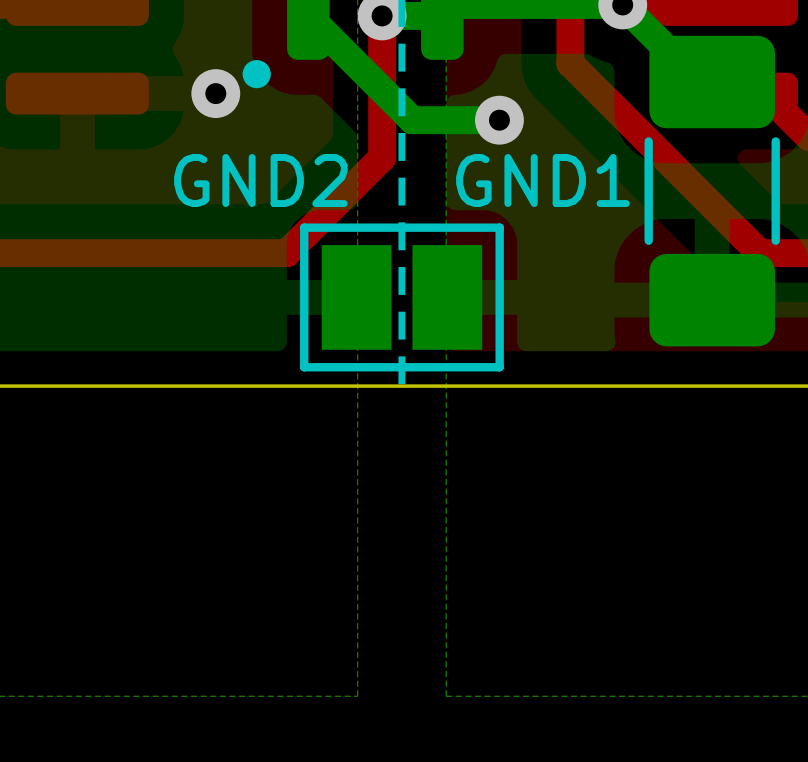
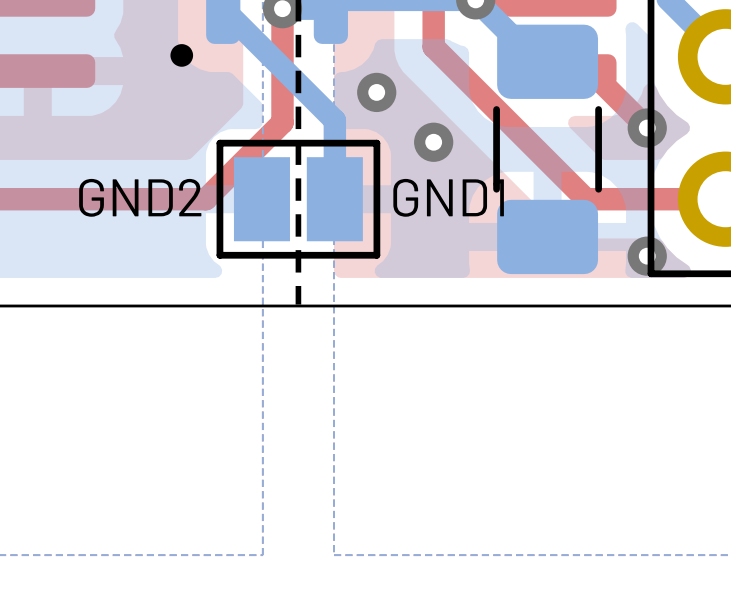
via position: (215, 93) -> (433, 142)
bottom track: (499, 120) (412, 120) -> (334, 199) (334, 120) (306, 92)
text position: GND2 (260, 180) -> GND2 (140, 197)
text position: GND1 (542, 180) -> GND1 (448, 197)
part position: (401, 297) -> (298, 199)

